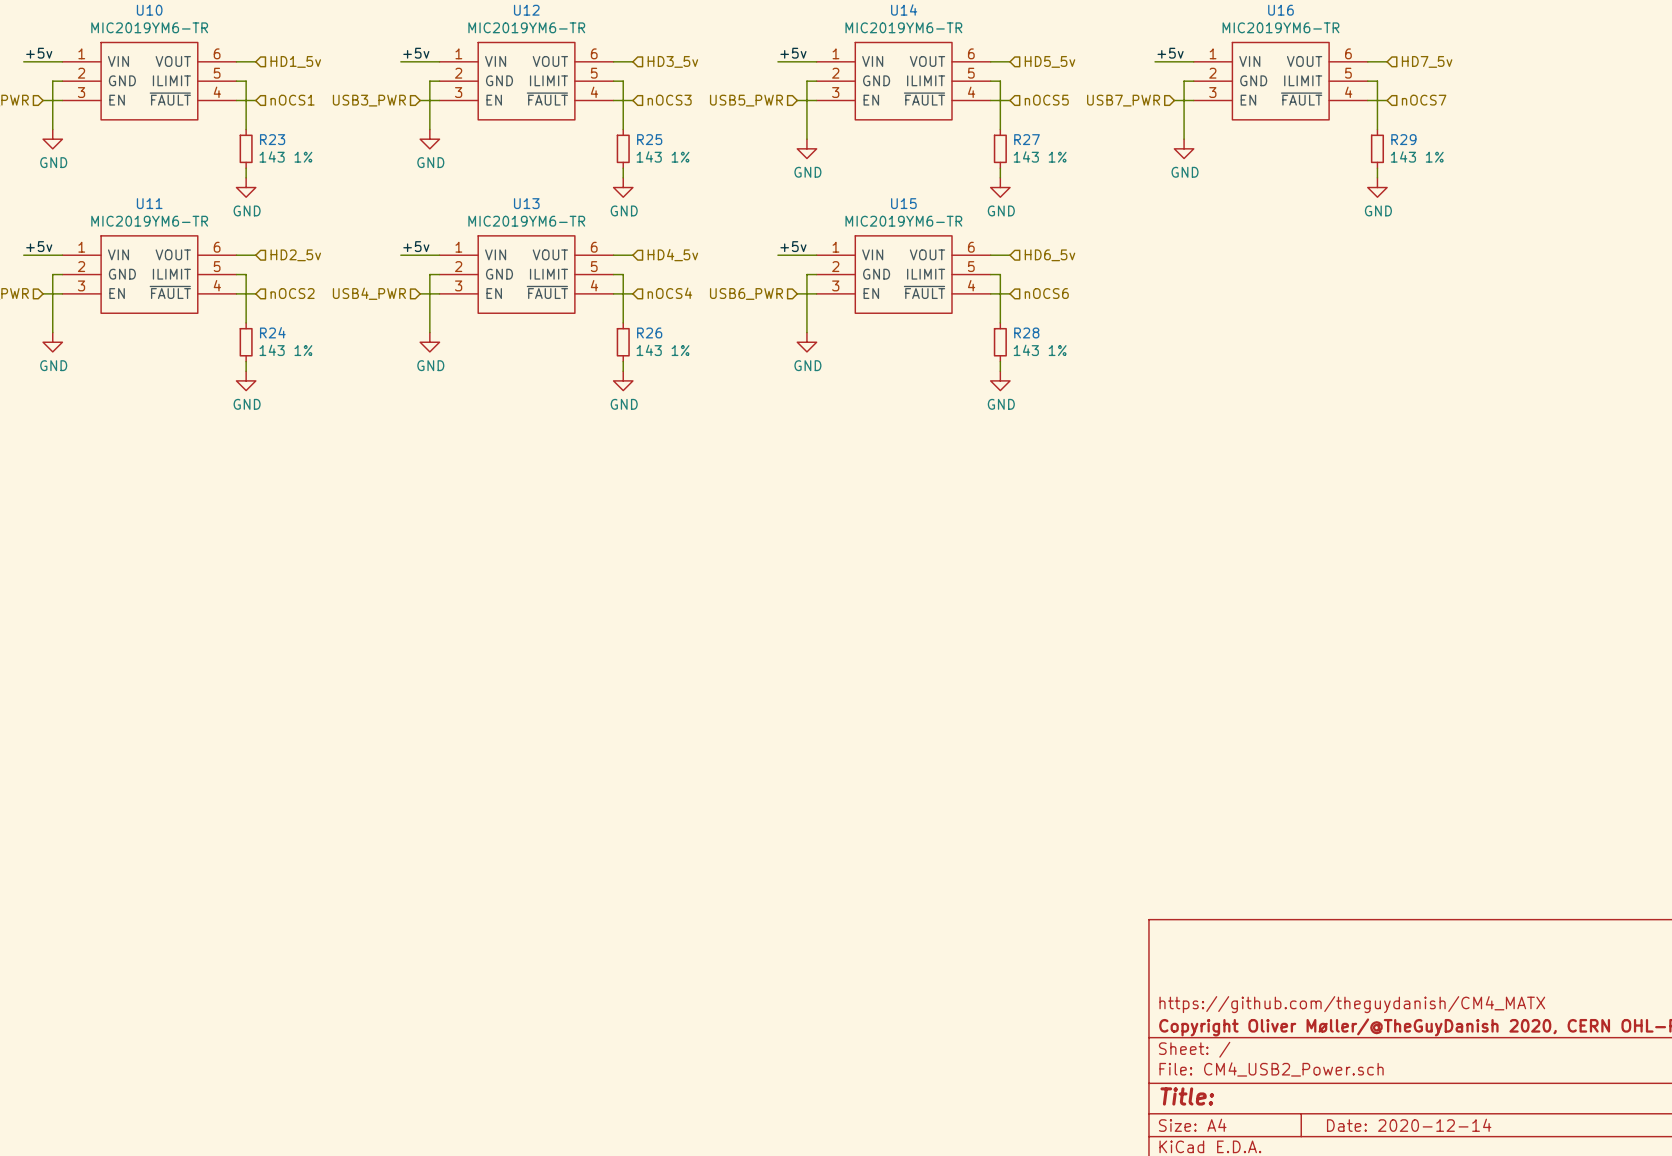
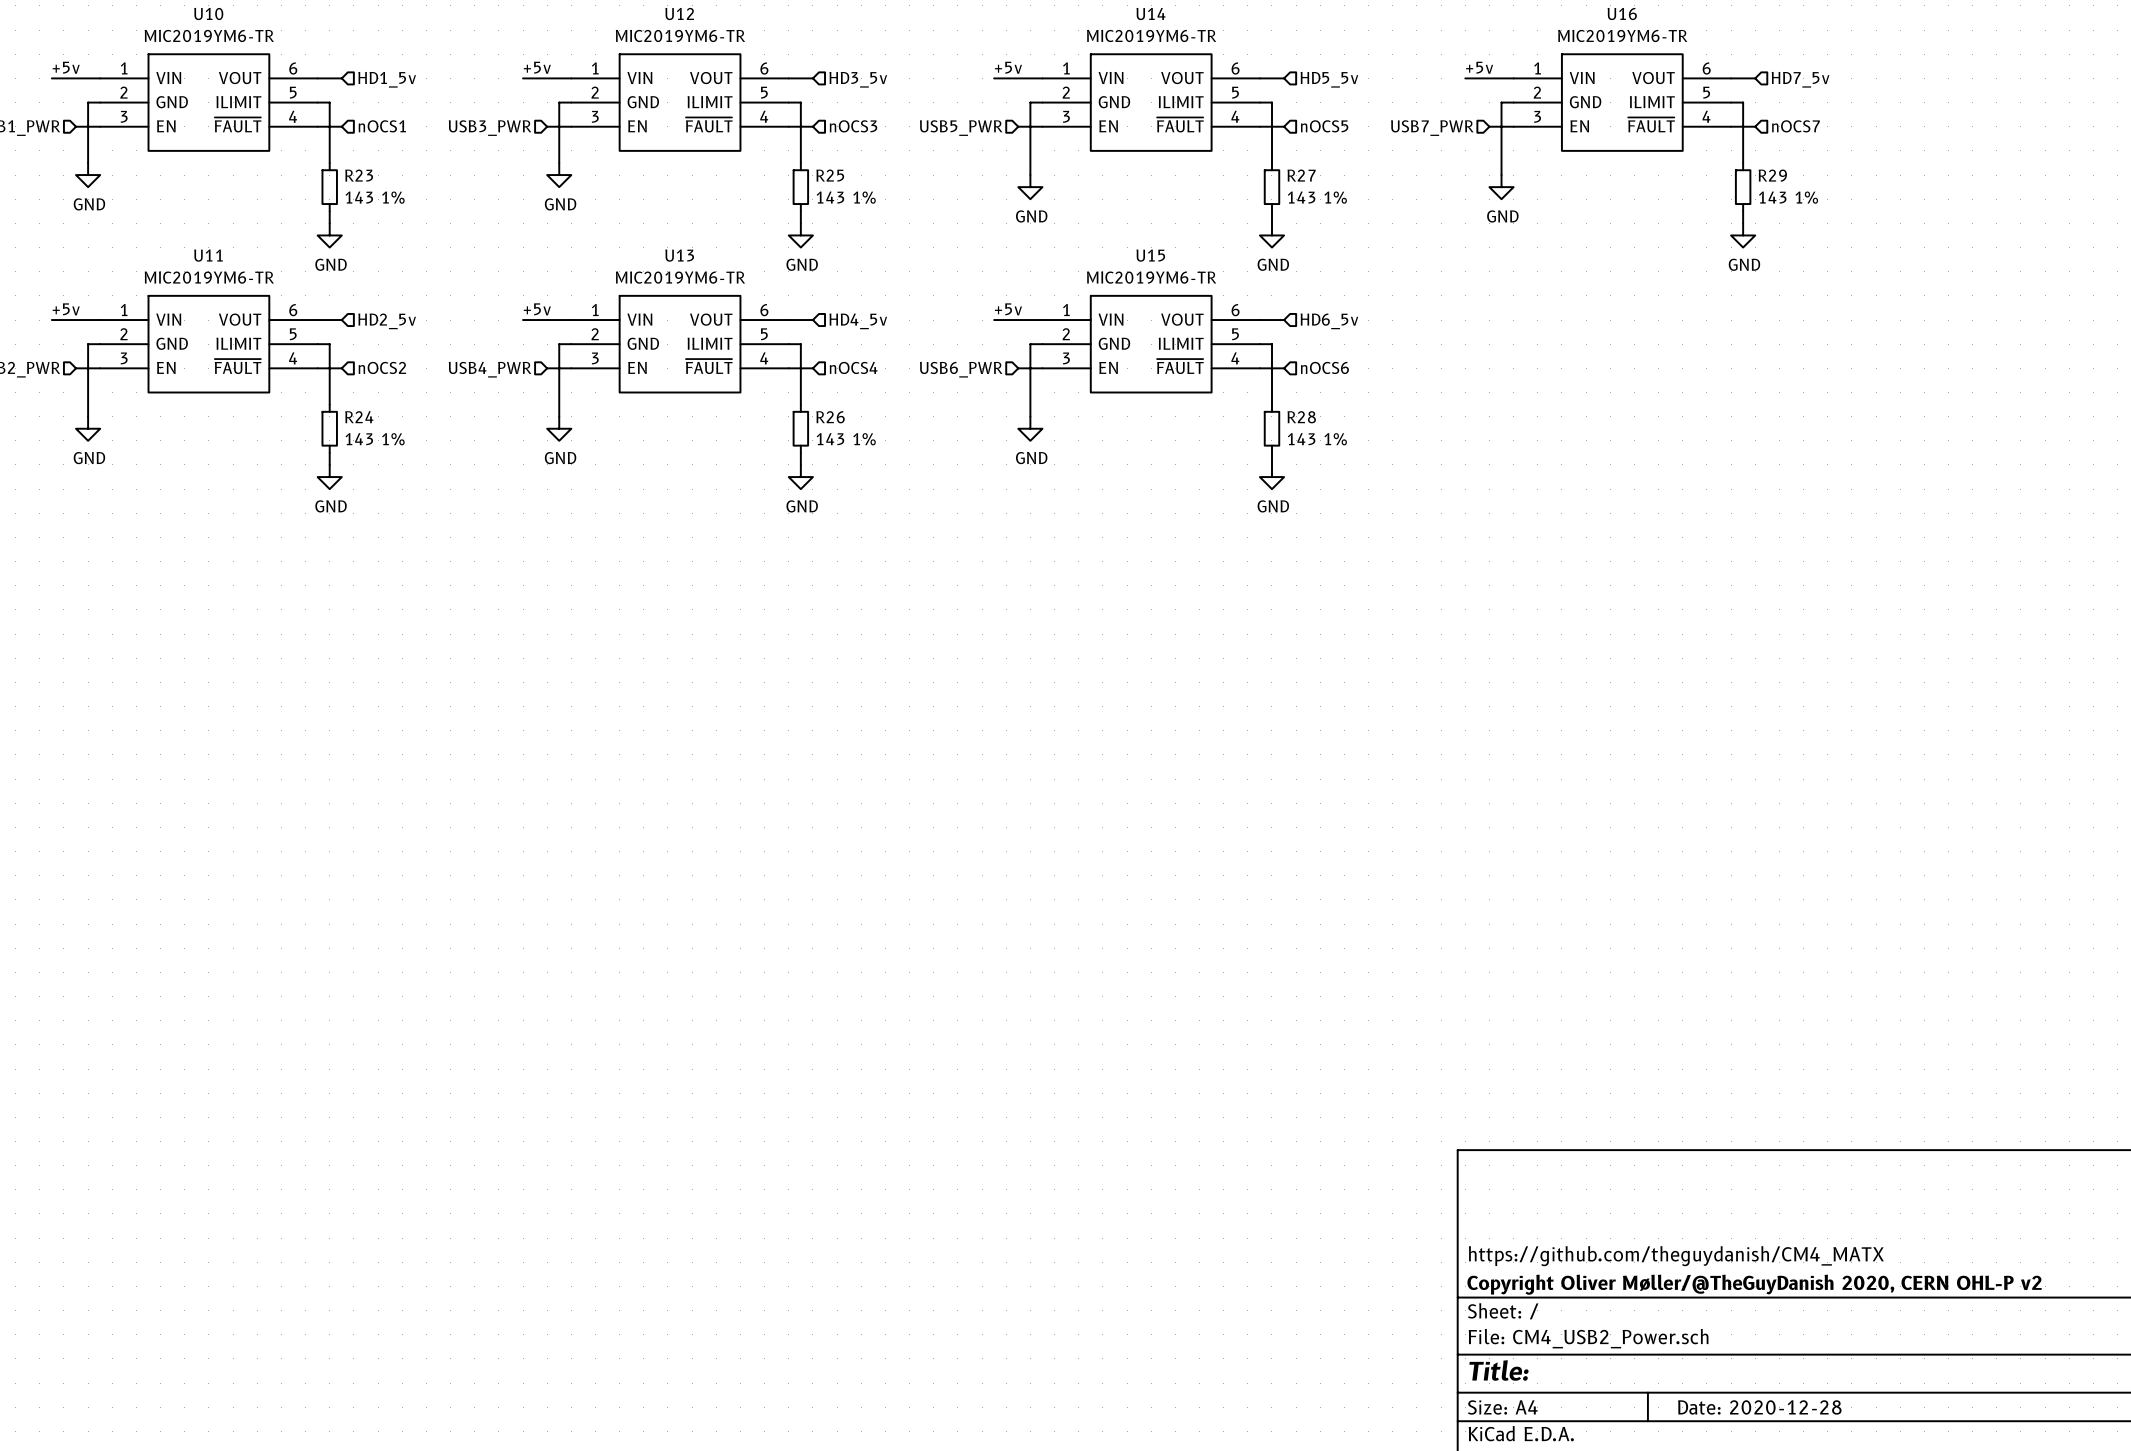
title block: Date: 2020-12-14 (1409, 1125) -> Date: 2020-12-28 (1759, 1407)

